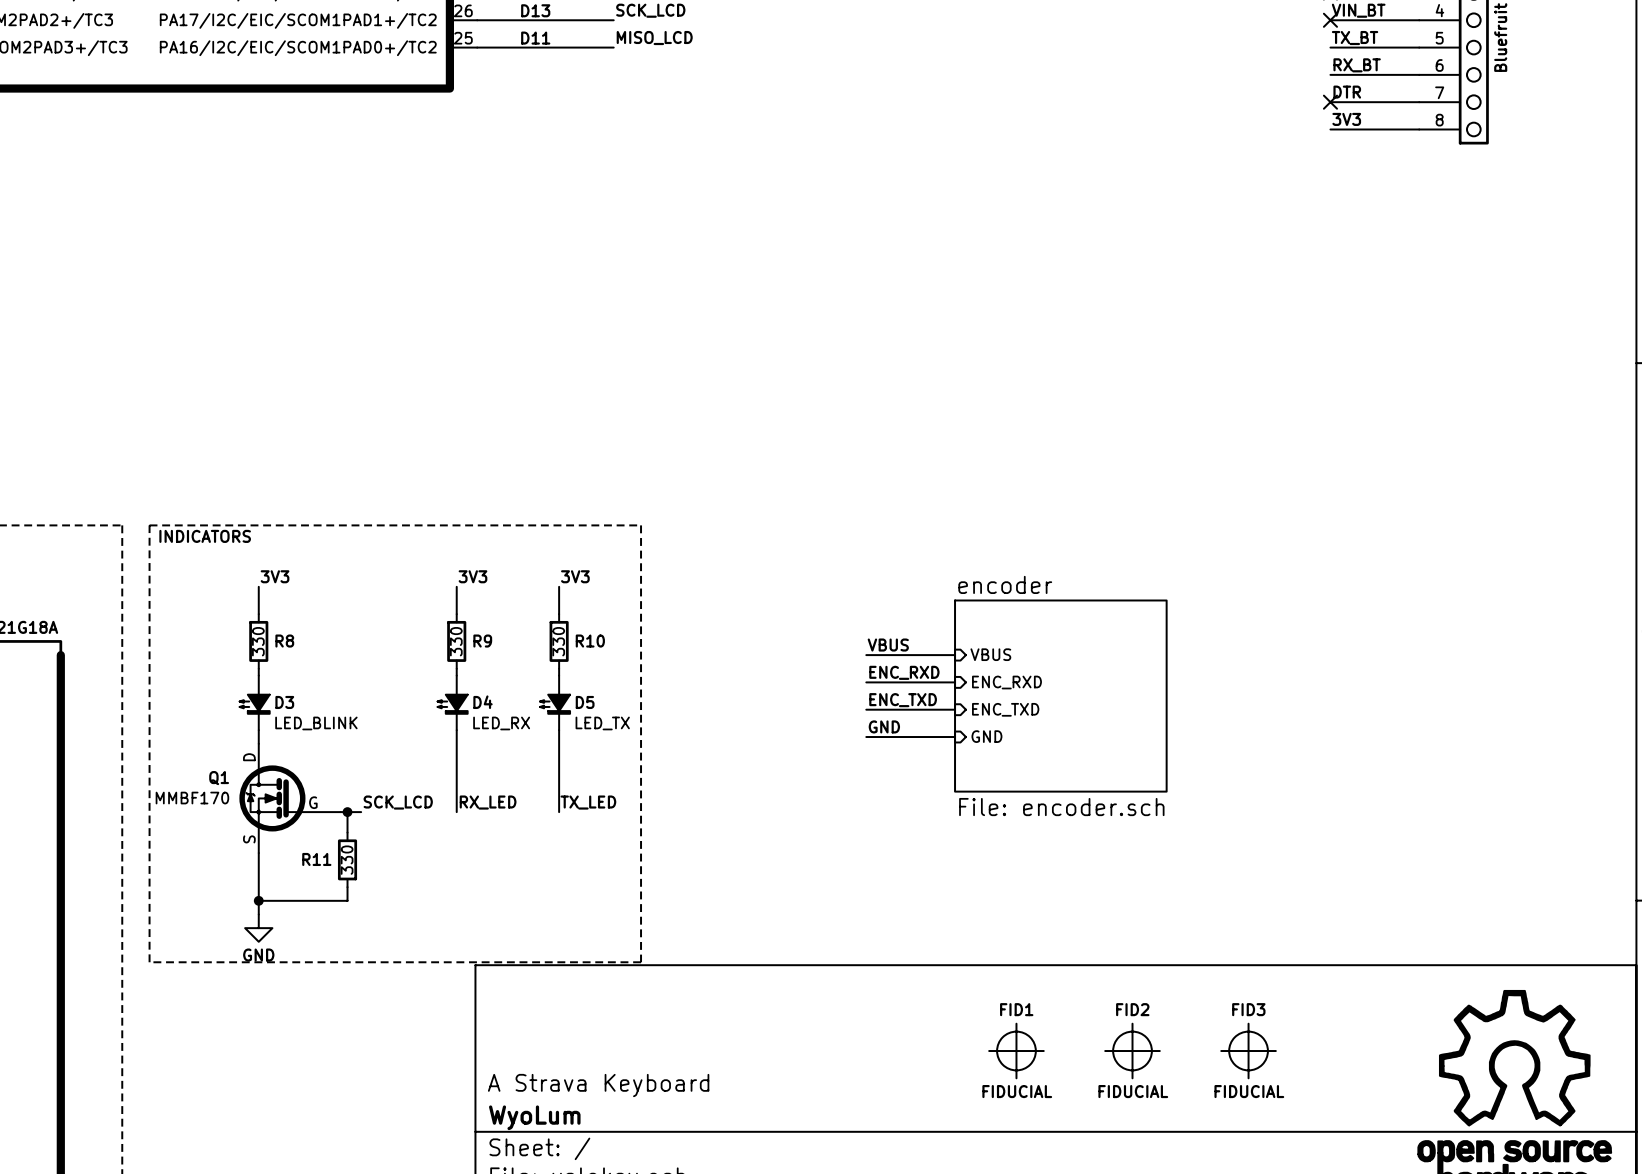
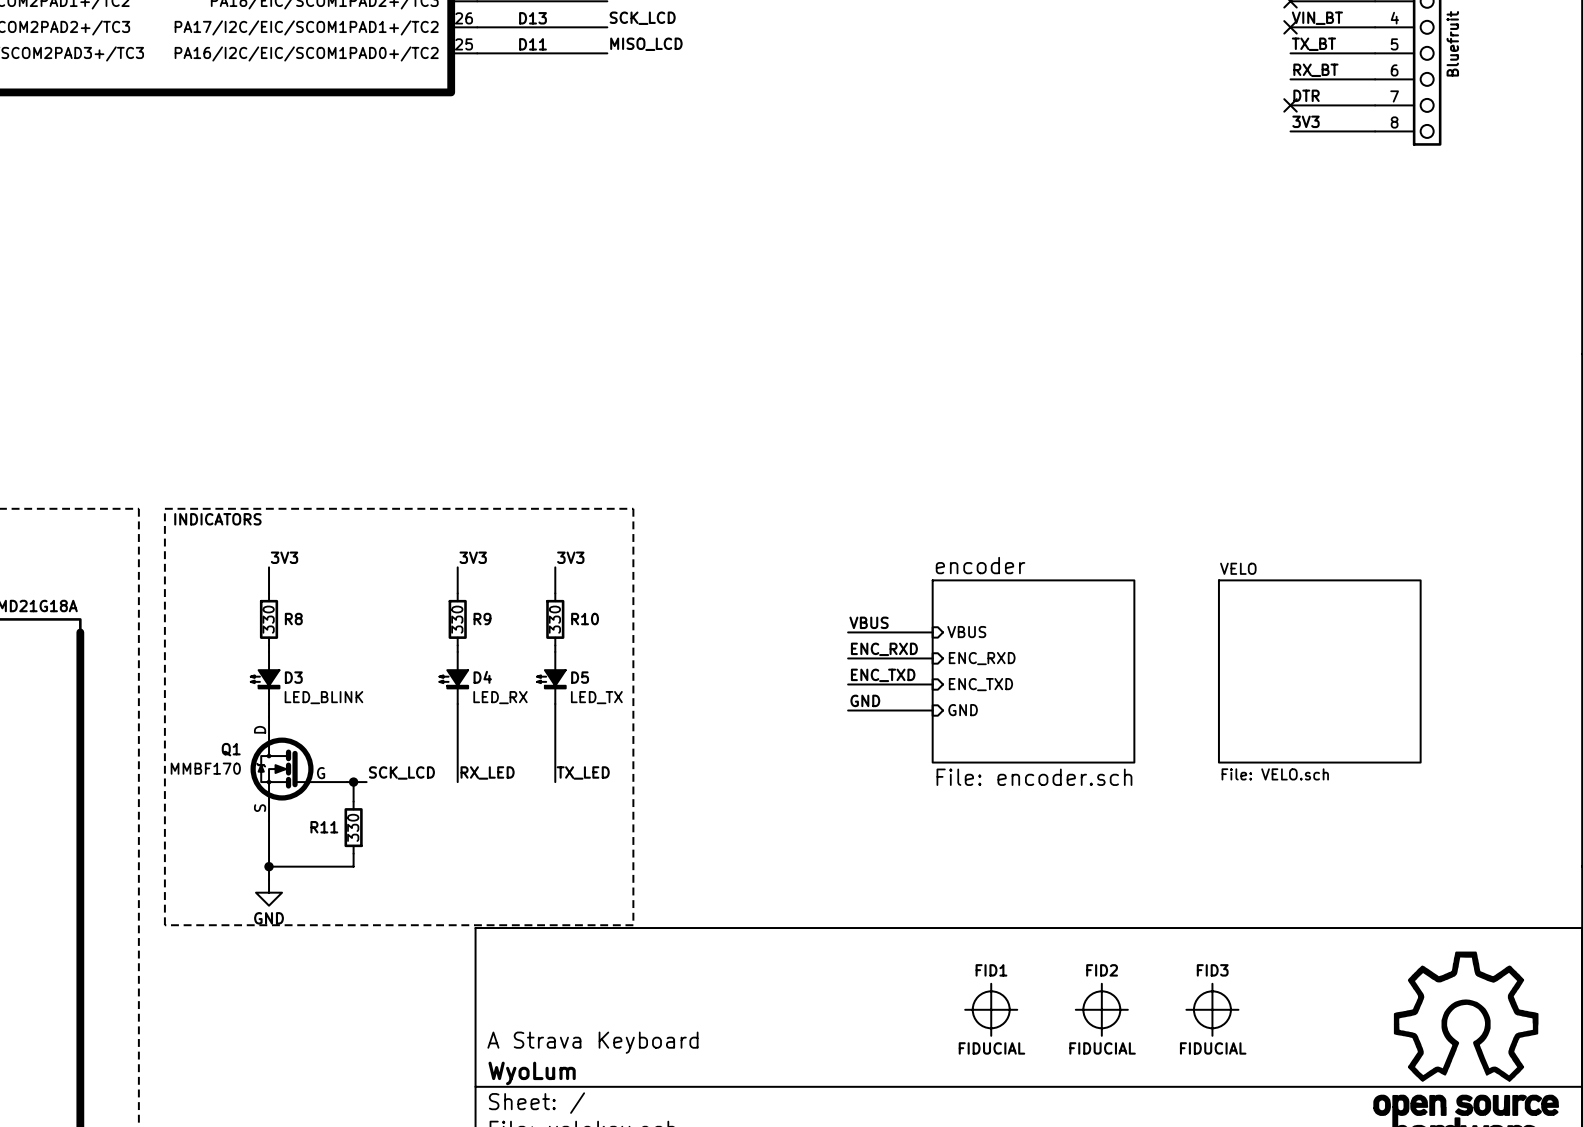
sheet VELO: none -> File: VELO.sch (1319, 671)

